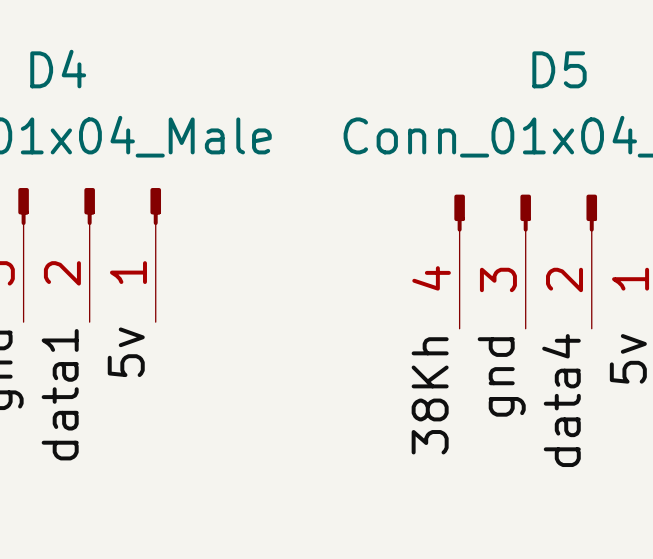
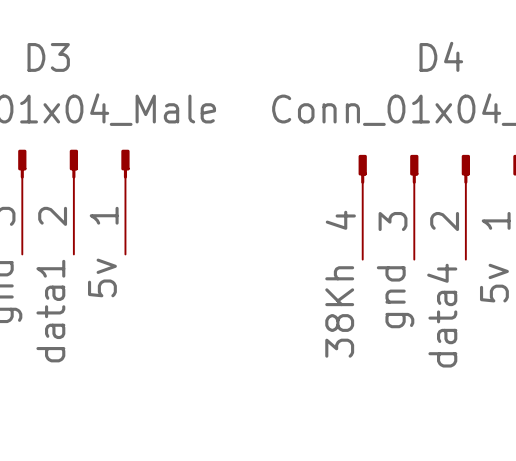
D4 name: D4 (58, 69) -> D3 (48, 57)
D5 name: D5 (559, 69) -> D4 (441, 56)

